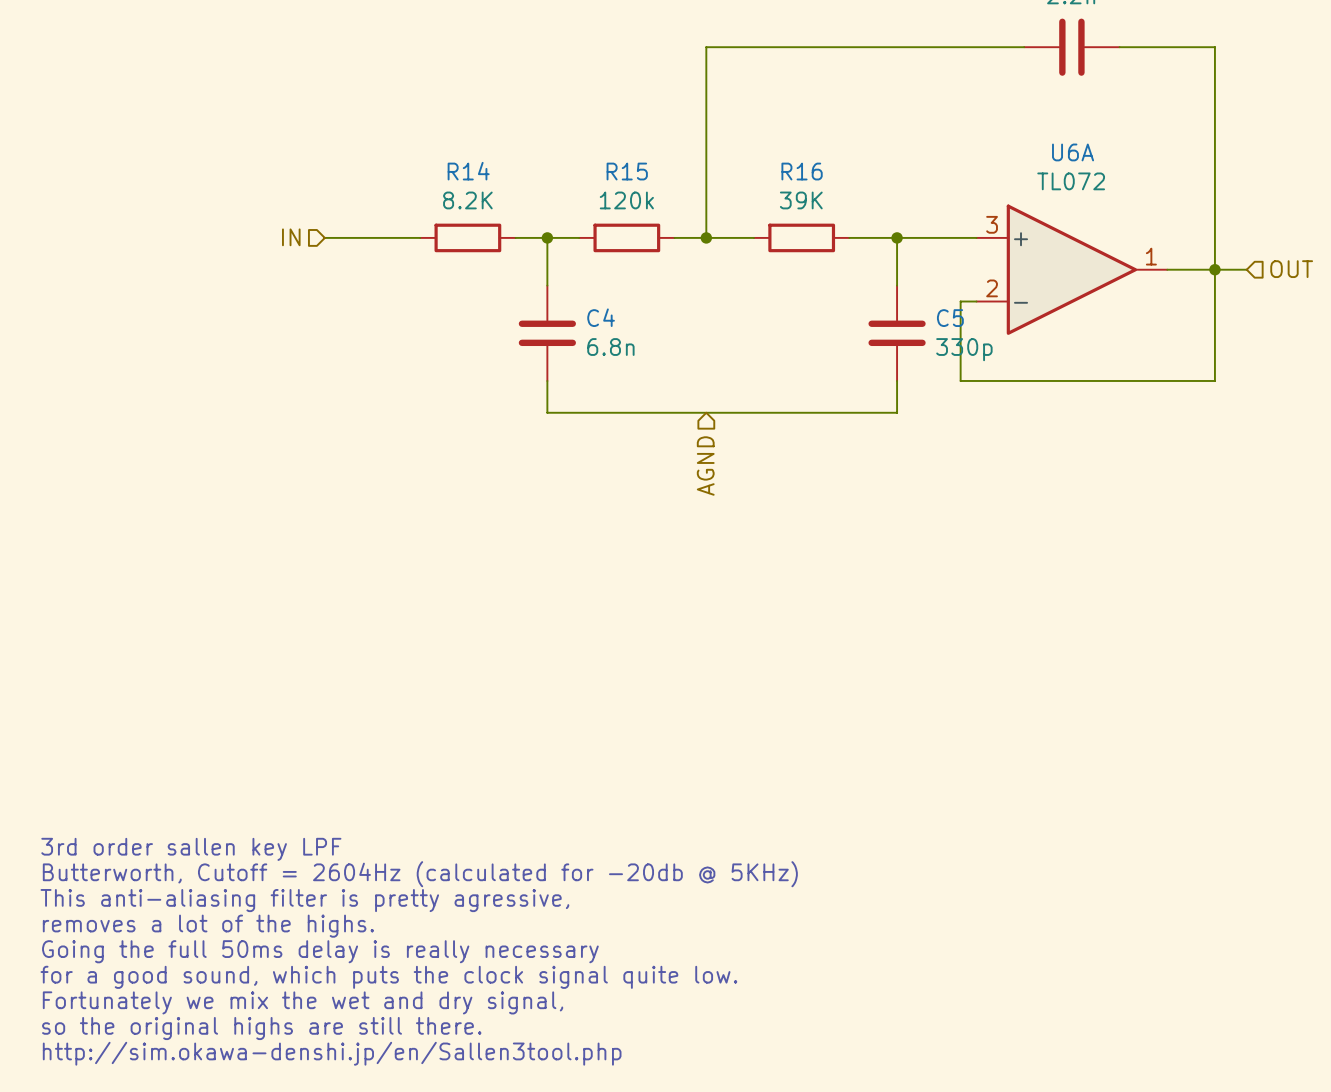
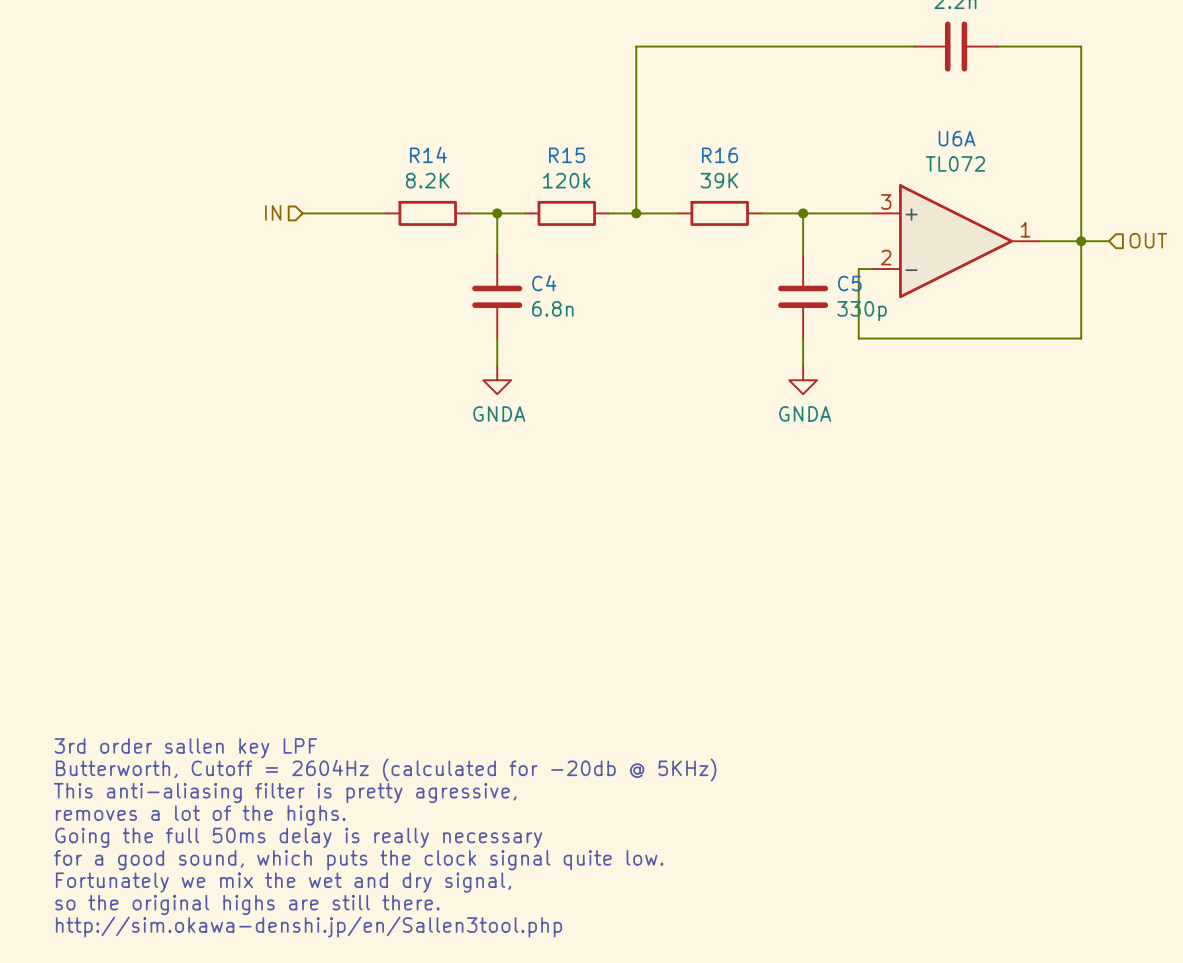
wire: (547, 412) (897, 412) -> none
power symbol: none -> GNDA (497, 380)
power symbol: none -> GNDA (803, 380)
hierarchical label: AGND (705, 466) -> none

